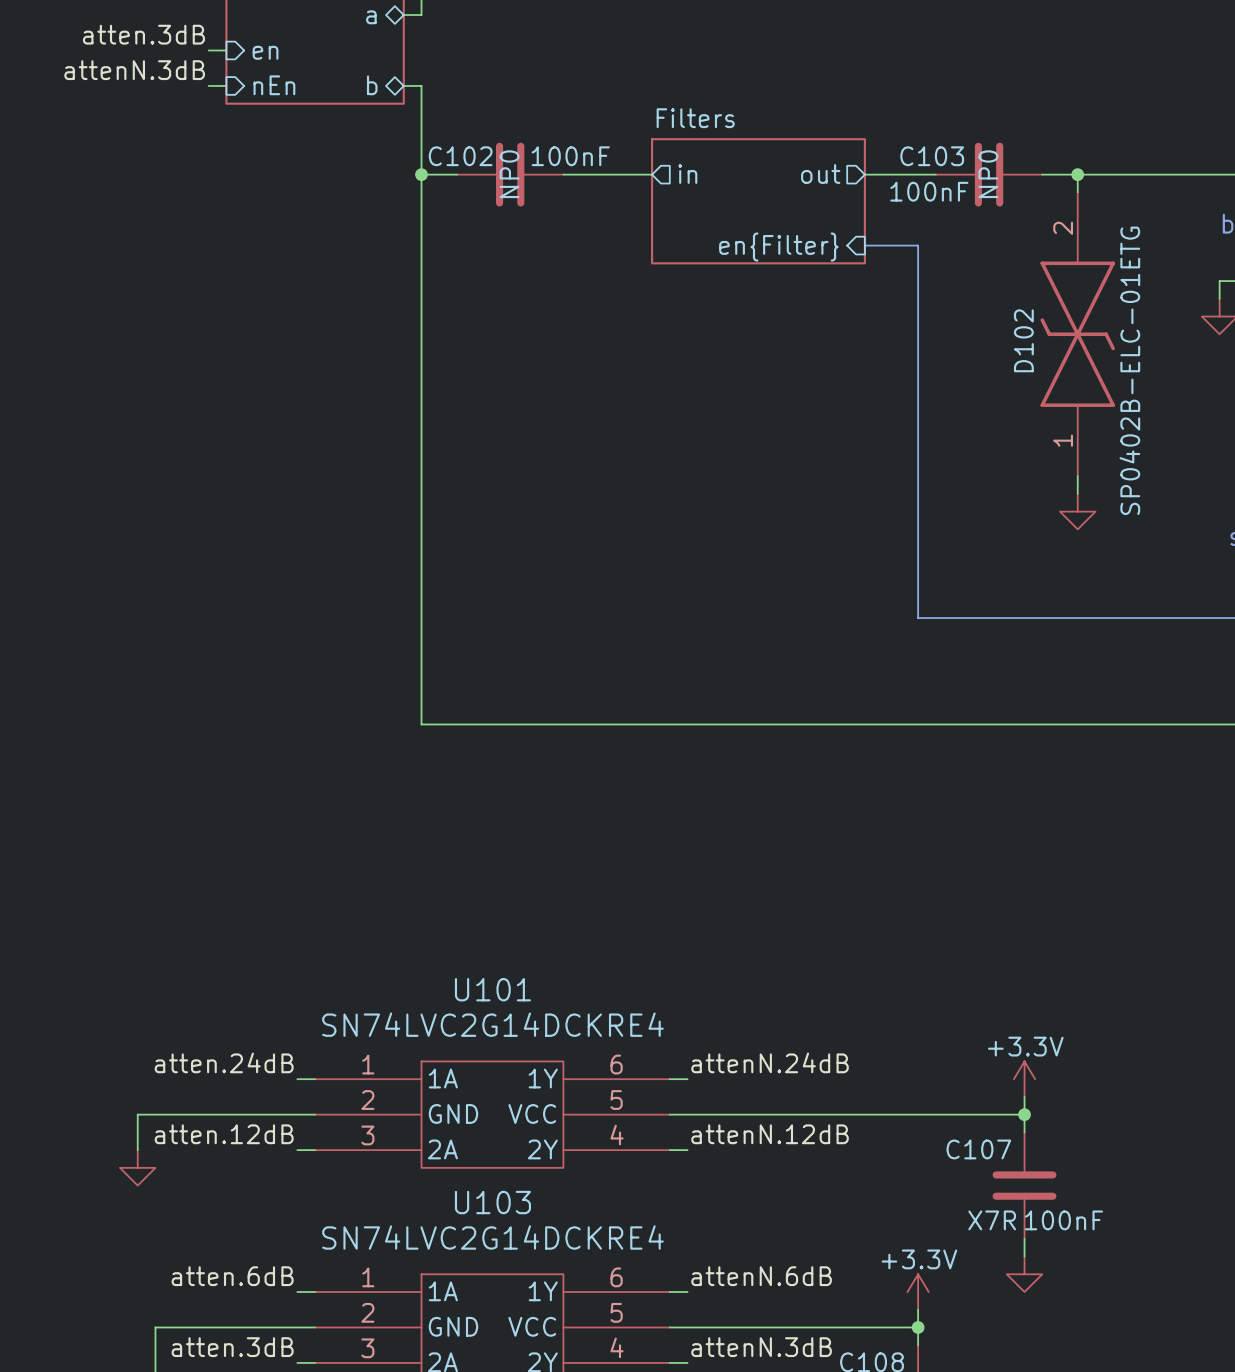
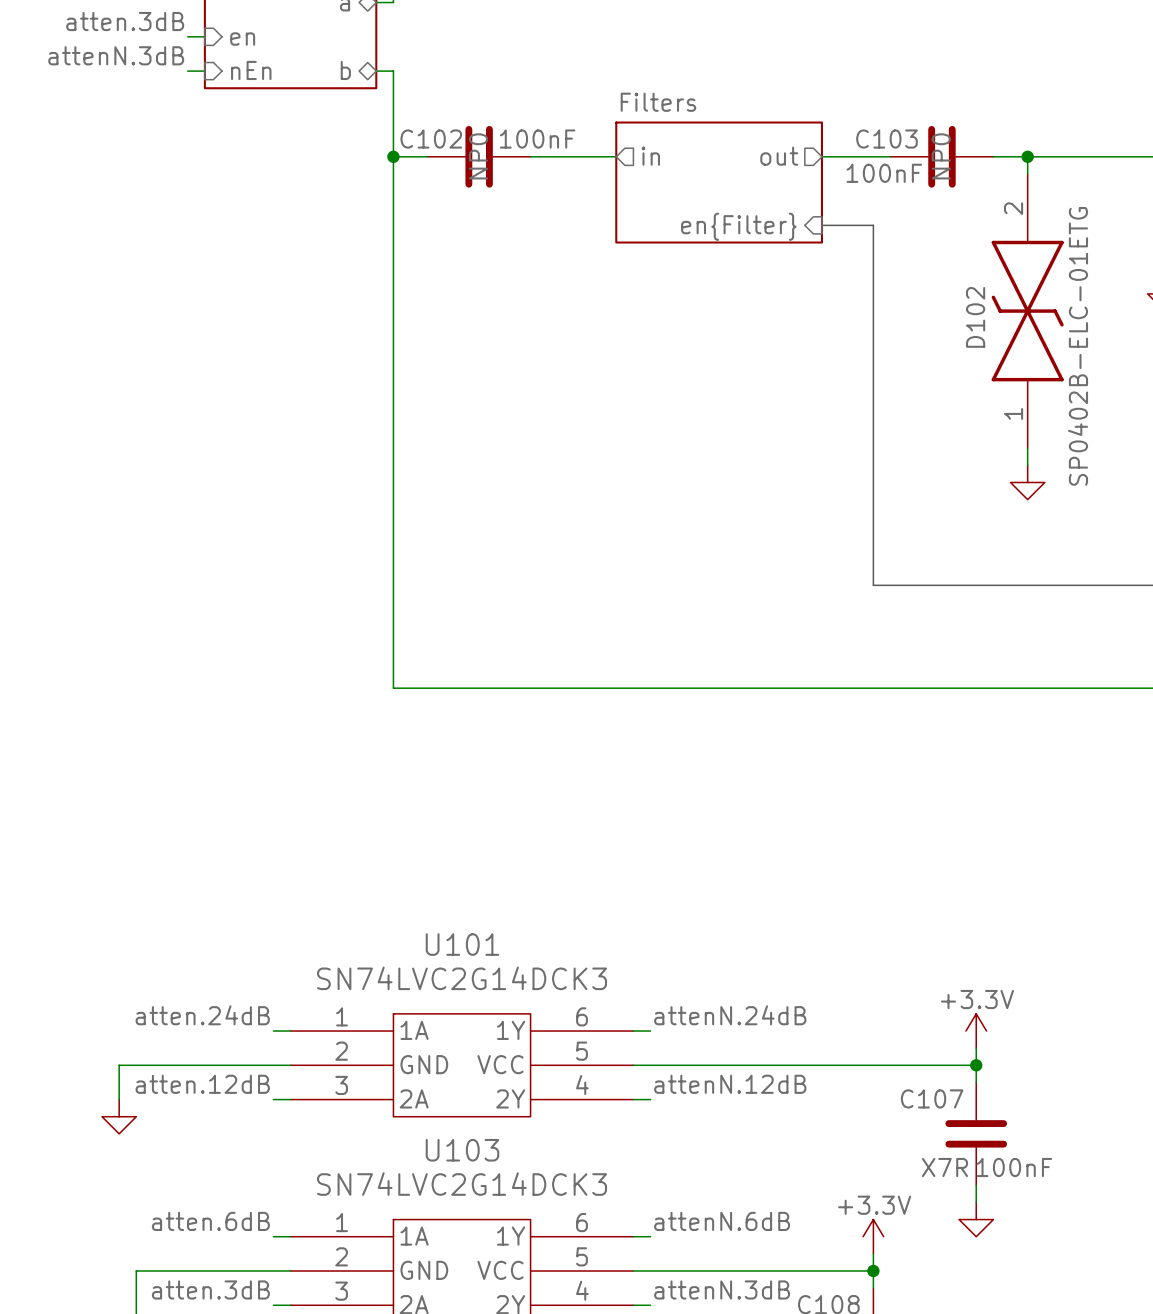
U101 value: SN74LVC2G14DCKRE4 (492, 1024) -> SN74LVC2G14DCK3 (462, 978)
U103 value: SN74LVC2G14DCKRE4 (492, 1237) -> SN74LVC2G14DCK3 (462, 1184)

